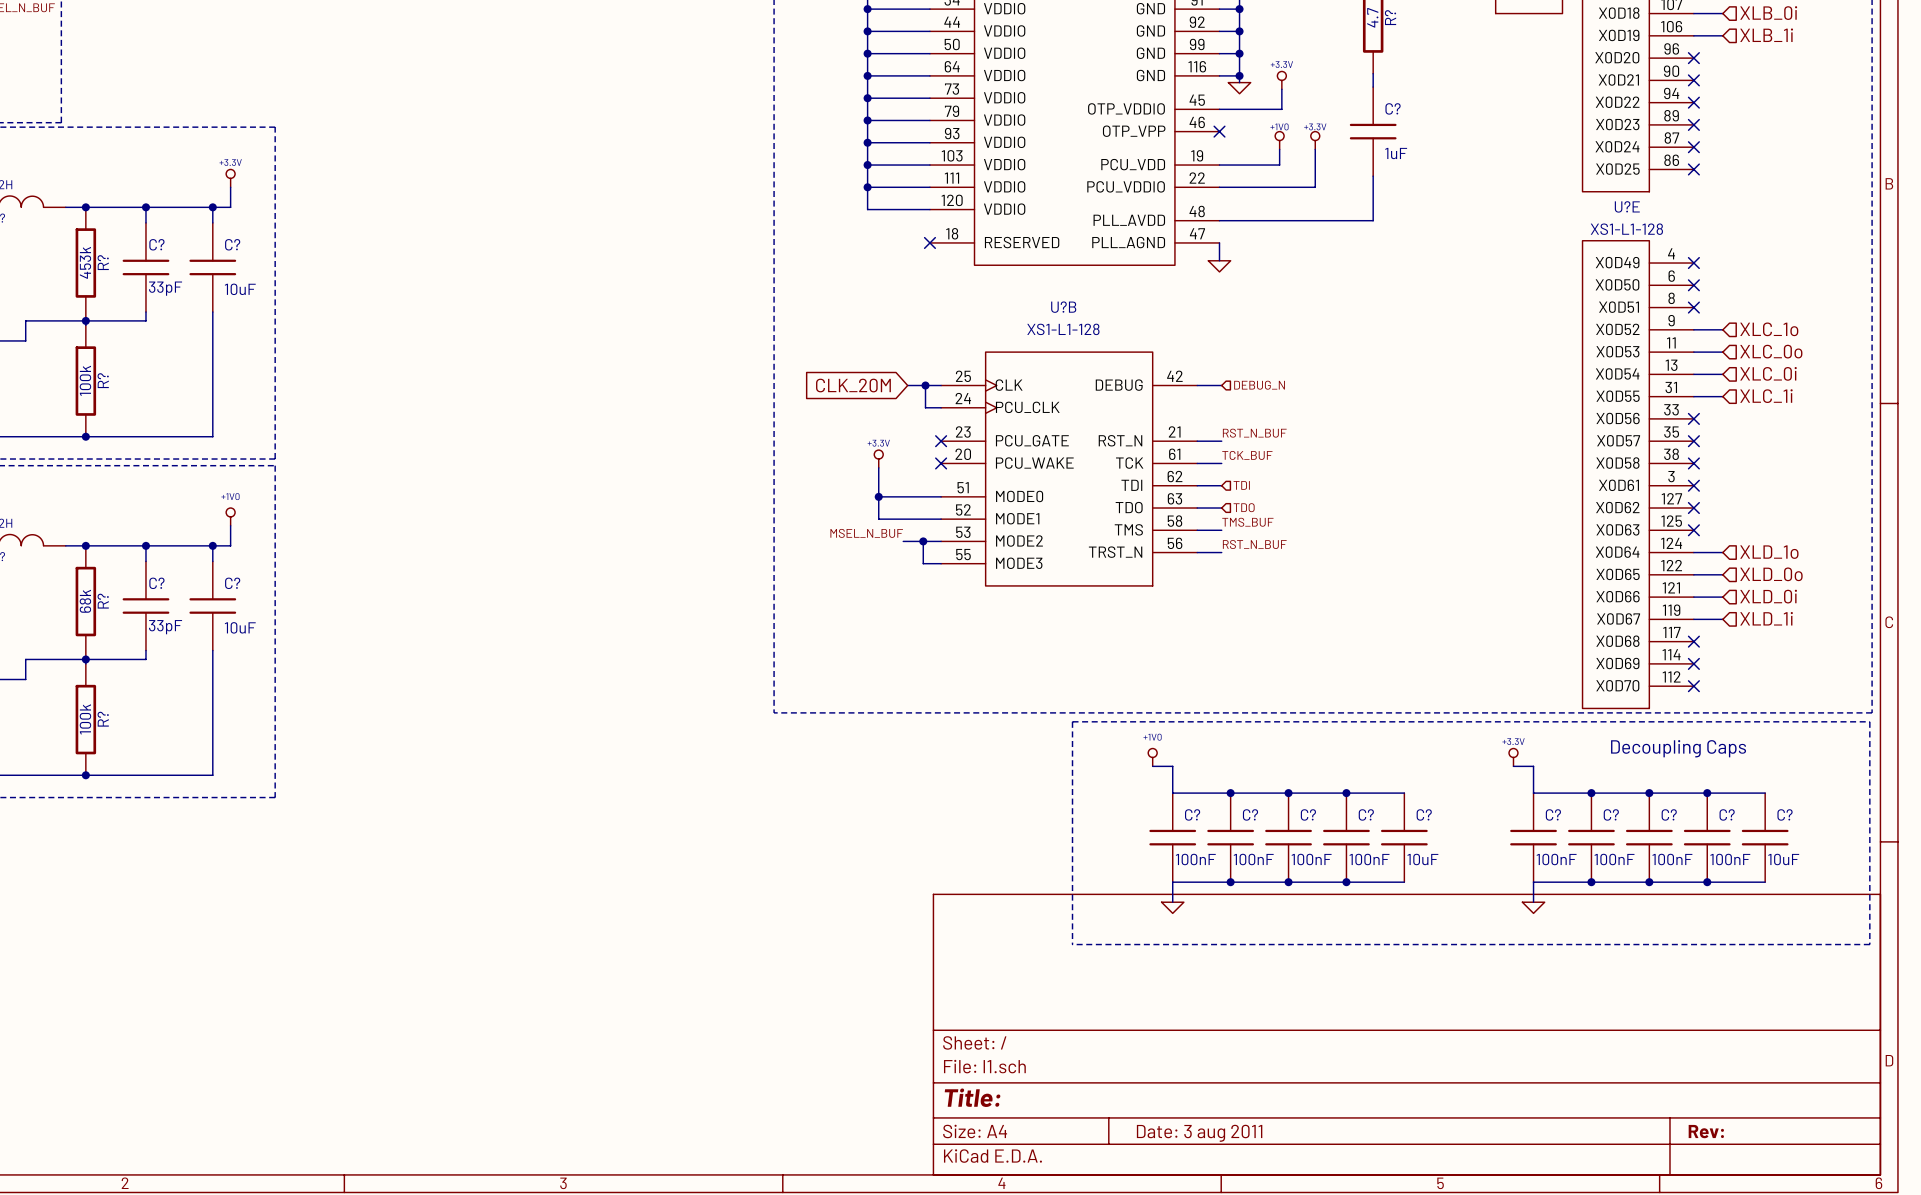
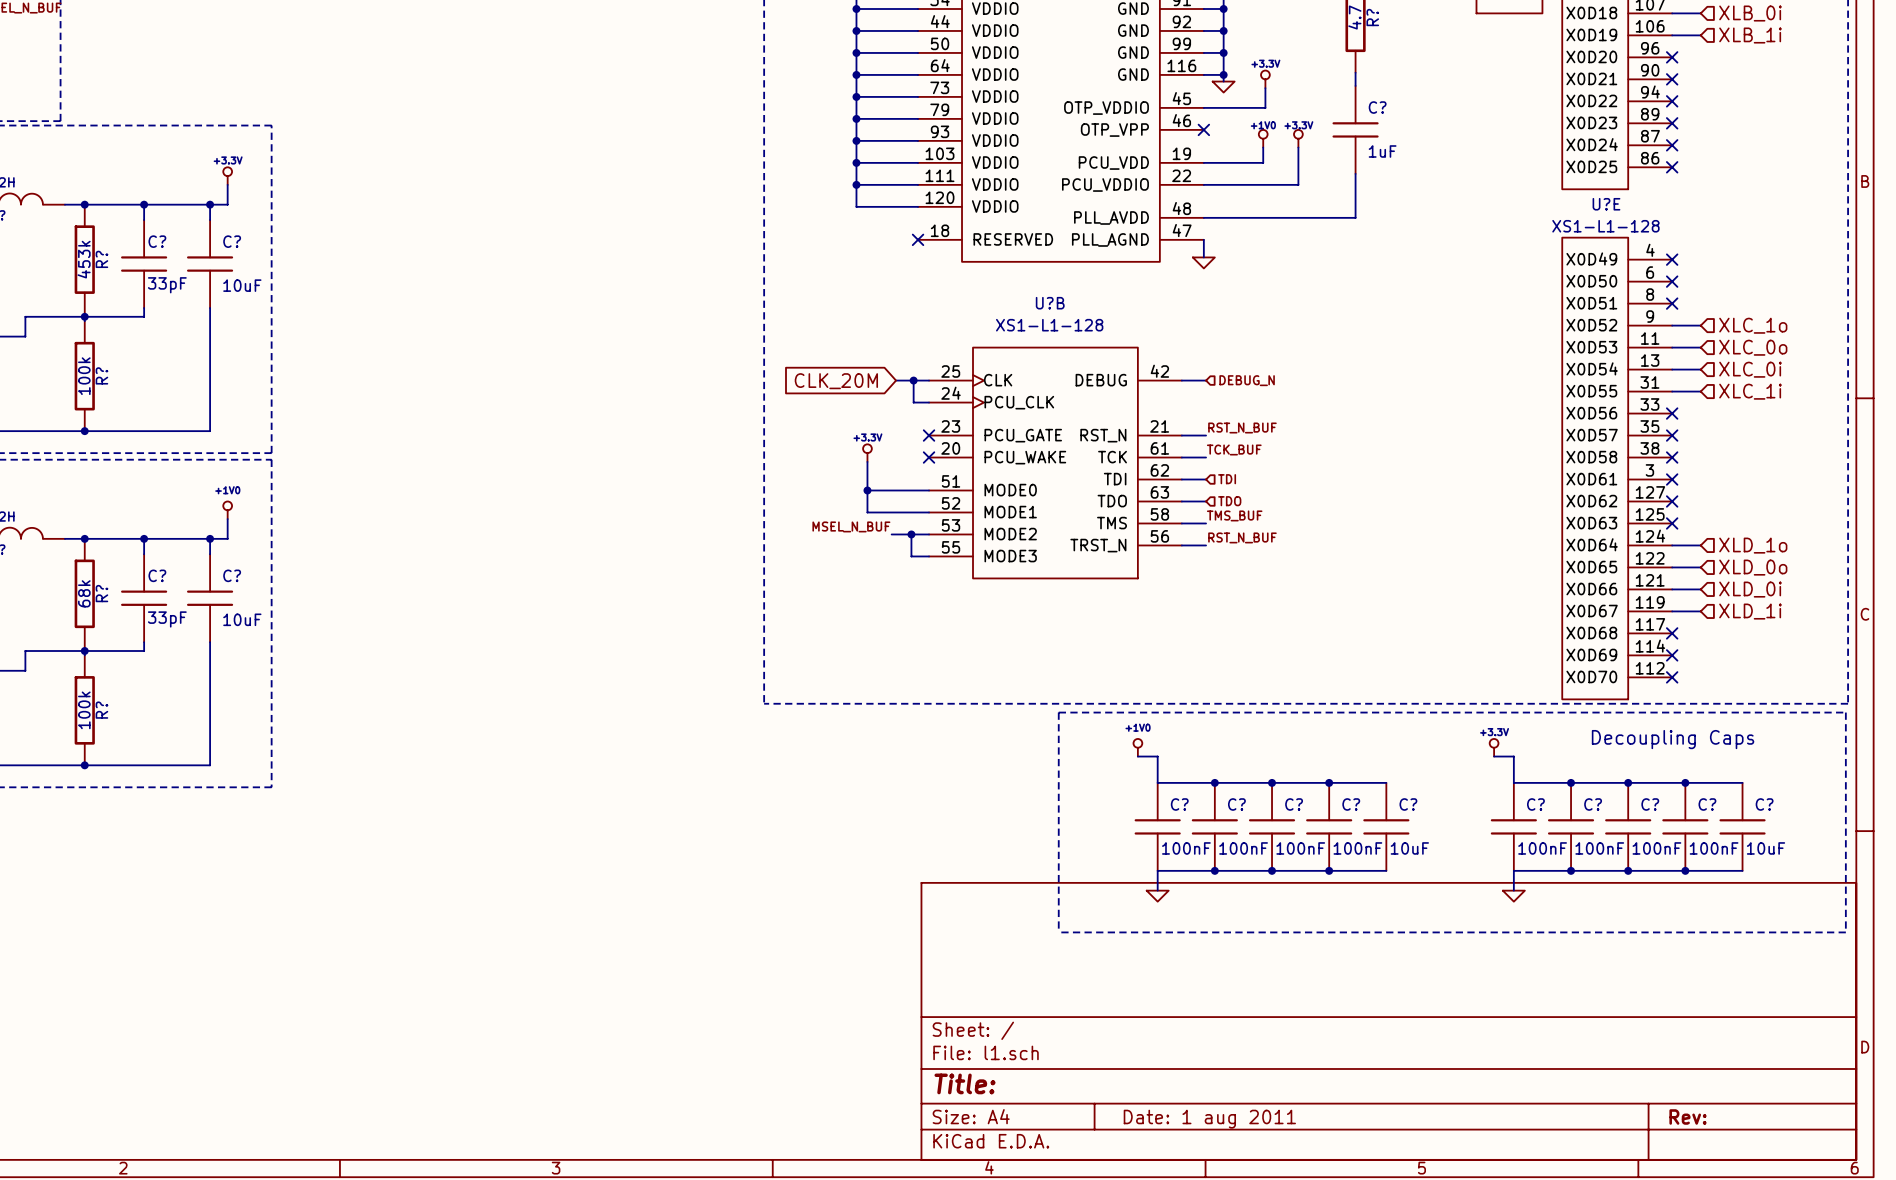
title block: Date: 3 aug 2011 (1199, 1133) -> Date: 1 aug 2011 (1209, 1119)

